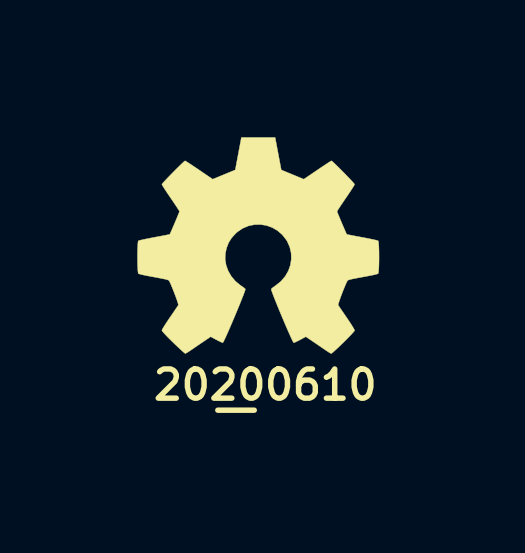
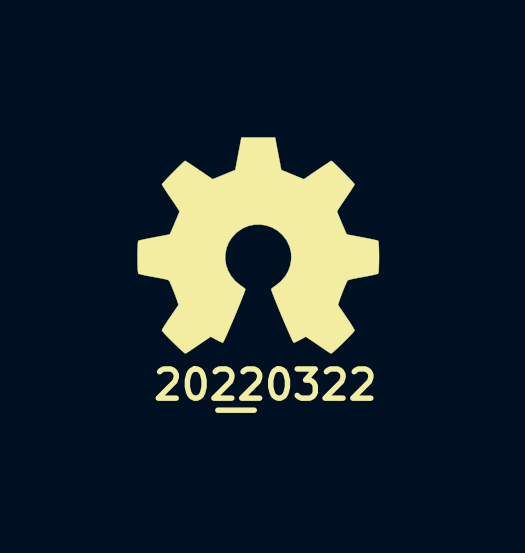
drawing shape: [155, 366, 374, 413] -> [155, 366, 374, 413]

